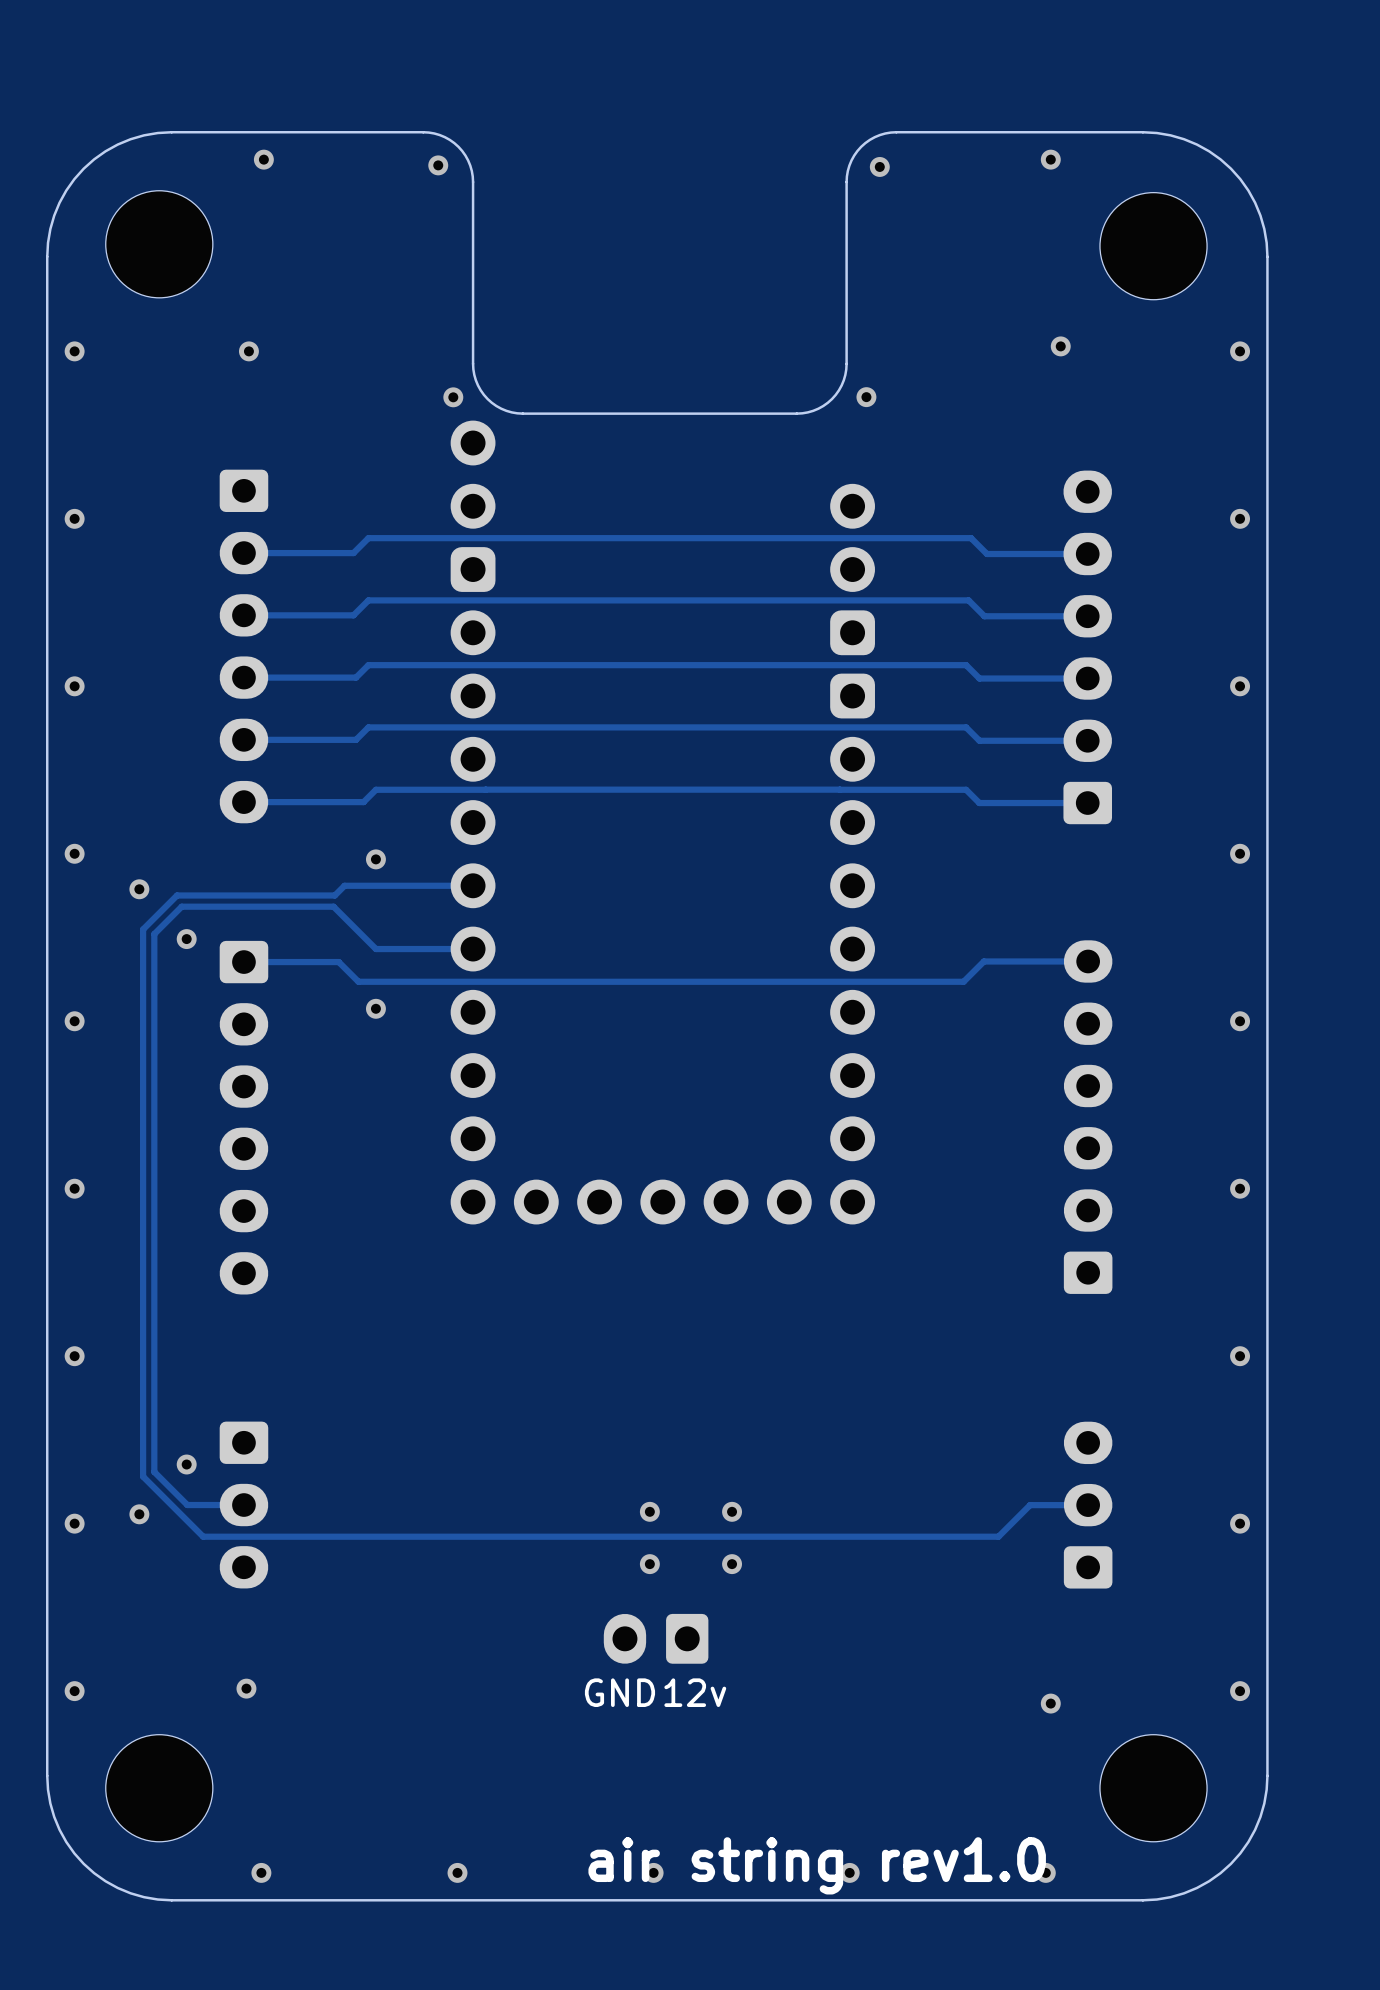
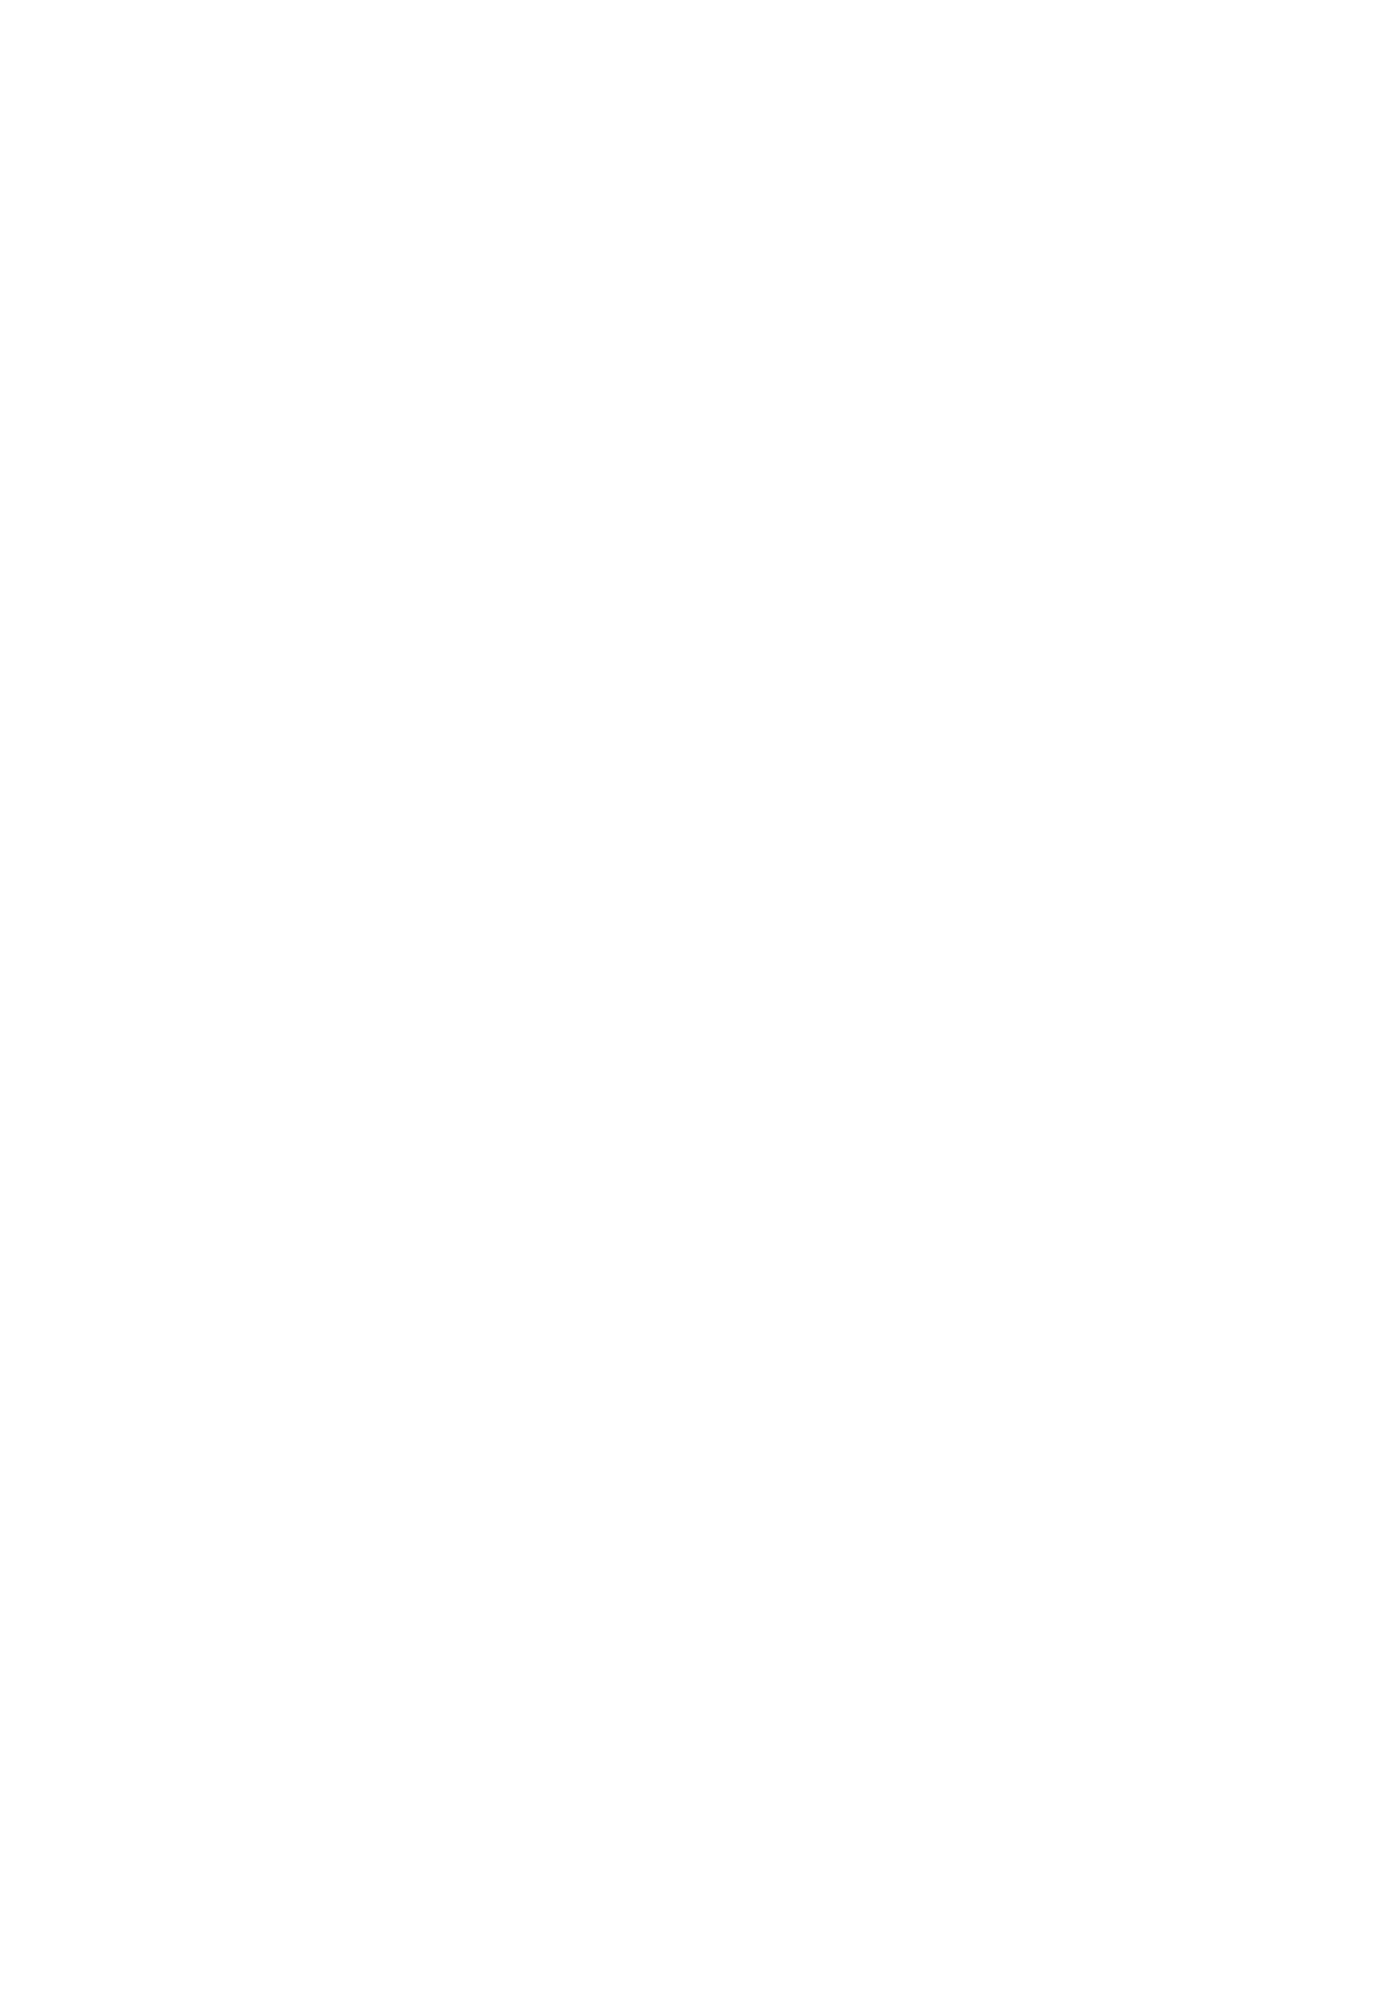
board edge: (1142, 132) (896, 132) (879, 135) (865, 143) (851, 160) (846, 176) (845, 374) (838, 390) (827, 402) (813, 410) (796, 413) (522, 413) (506, 410) (491, 402) (480, 390) (473, 369) (471, 170) (462, 150) (454, 143) (439, 135) (423, 132) (157, 133) (130, 139) (105, 151) (83, 168) (66, 190) (54, 215) (50, 229) (47, 256) (47, 1775) (50, 1803) (59, 1829) (66, 1842) (83, 1863) (105, 1881) (130, 1893) (144, 1897) (171, 1900) (1142, 1900) (1170, 1897) (1196, 1887) (1209, 1881) (1230, 1863) (1248, 1842) (1255, 1829) (1264, 1803) (1267, 1775) (1266, 242) (1264, 229) (1255, 202) (1240, 179) (1230, 168) (1220, 159) (1196, 144) (1170, 135) (1142, 132) -> none
via: (263, 159) -> none
via: (1050, 159) -> none
via: (438, 165) -> none
via: (879, 166) -> none
part: (159, 244) -> none
part: (1153, 246) -> none
via: (1060, 346) -> none
via: (74, 351) -> none
via: (248, 351) -> none
via: (1240, 351) -> none
via: (453, 397) -> none
via: (866, 397) -> none
via: (74, 518) -> none
via: (1240, 518) -> none
track: (243, 553) (353, 553) (368, 538) (971, 538) (986, 554) (1087, 554) -> none
track: (243, 615) (353, 615) (368, 600) (968, 600) (984, 616) (1087, 616) -> none
part: (243, 646) -> none
part: (1087, 647) -> none
track: (243, 677) (356, 677) (368, 665) (966, 665) (979, 678) (1087, 678) -> none
via: (74, 686) -> none
via: (1240, 686) -> none
track: (243, 739) (356, 739) (368, 727) (966, 727) (979, 740) (1087, 740) -> none
track: (485, 789) (375, 789) (363, 802) (243, 802) -> none
track: (839, 789) (485, 789) -> none
track: (839, 789) (966, 789) (979, 803) (1087, 803) -> none
part: (662, 822) -> none
via: (74, 853) -> none
via: (1240, 853) -> none
via: (375, 859) -> none
track: (473, 885) (344, 885) (334, 895) (177, 895) (143, 929) (143, 1476) (203, 1536) (998, 1536) (1030, 1505) (1088, 1505) -> none
via: (139, 889) -> none
via: (186, 939) -> none
track: (473, 949) (375, 949) (333, 906) (181, 906) (154, 934) (154, 1471) (187, 1505) (243, 1505) -> none
track: (1088, 961) (983, 961) (963, 981) (358, 981) (338, 962) (243, 962) -> none
via: (375, 1008) -> none
via: (74, 1021) -> none
via: (1240, 1021) -> none
part: (243, 1117) -> none
part: (1088, 1117) -> none
via: (74, 1188) -> none
via: (1240, 1188) -> none
via: (74, 1356) -> none
via: (1240, 1356) -> none
via: (186, 1464) -> none
part: (243, 1505) -> none
part: (1088, 1505) -> none
via: (649, 1511) -> none
via: (732, 1511) -> none
via: (139, 1514) -> none
via: (74, 1523) -> none
via: (1240, 1523) -> none
via: (649, 1564) -> none
via: (732, 1564) -> none
part: (656, 1638) -> none
via: (246, 1688) -> none
via: (74, 1691) -> none
via: (1240, 1691) -> none
text: GND (619, 1692) -> none
text: 12v (695, 1692) -> none
via: (1050, 1703) -> none
part: (159, 1788) -> none
part: (1153, 1788) -> none
text: air string rev1.0 (817, 1865) -> none
via: (261, 1872) -> none
via: (457, 1872) -> none
via: (653, 1872) -> none
via: (849, 1872) -> none
via: (1045, 1872) -> none

